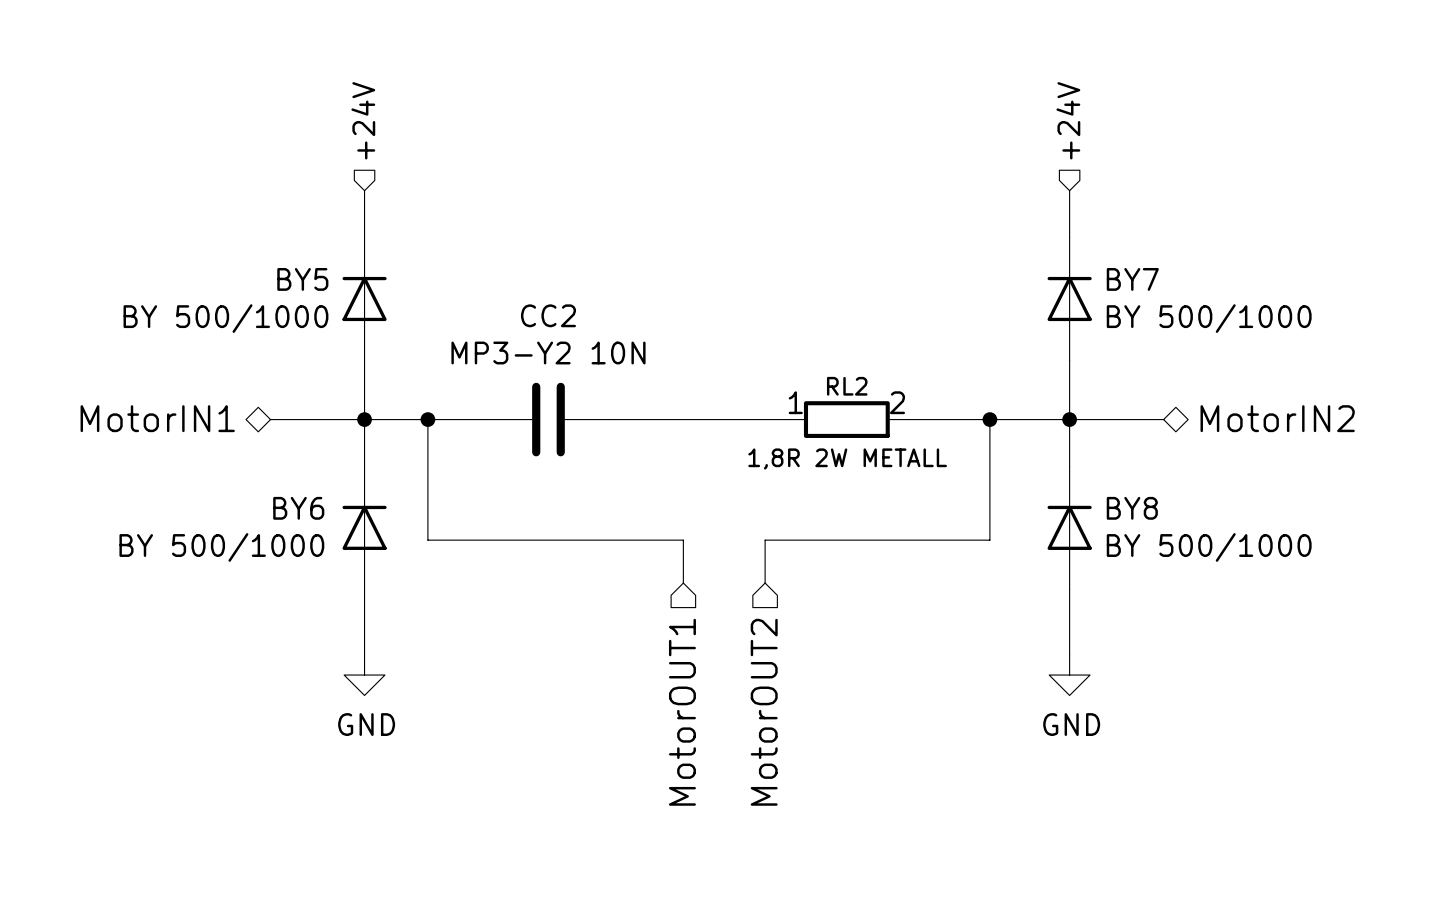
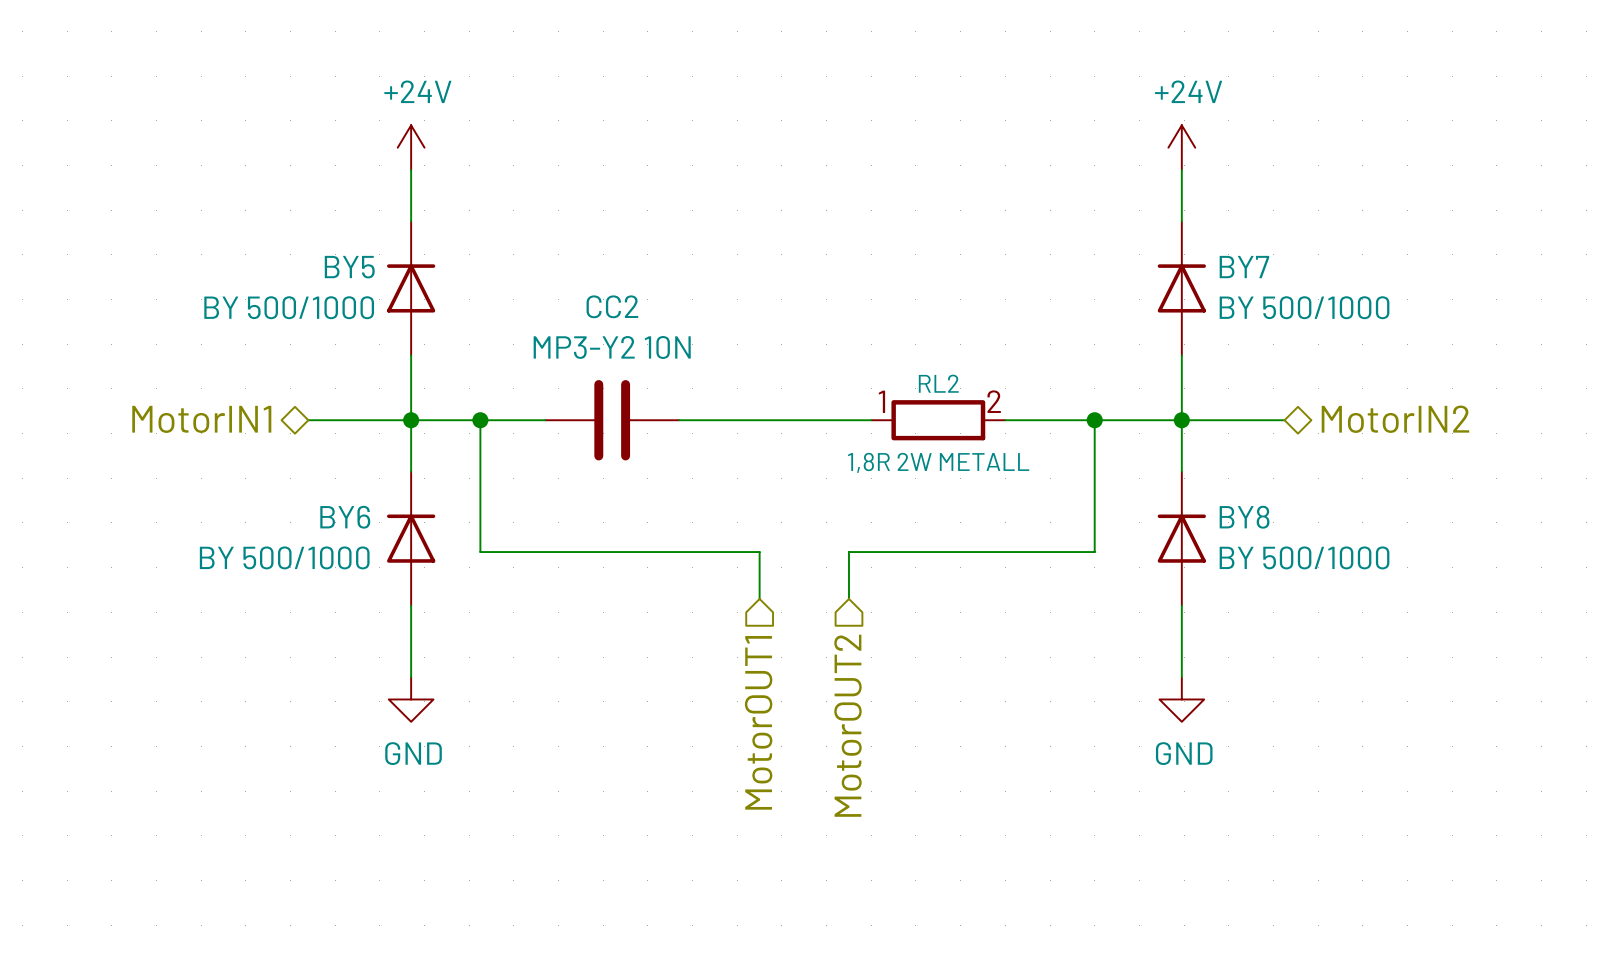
hierarchical label: +24V (363, 120) -> none
hierarchical label: +24V (1068, 120) -> none
power symbol: none -> +24V (411, 147)
power symbol: none -> +24V (1181, 147)

